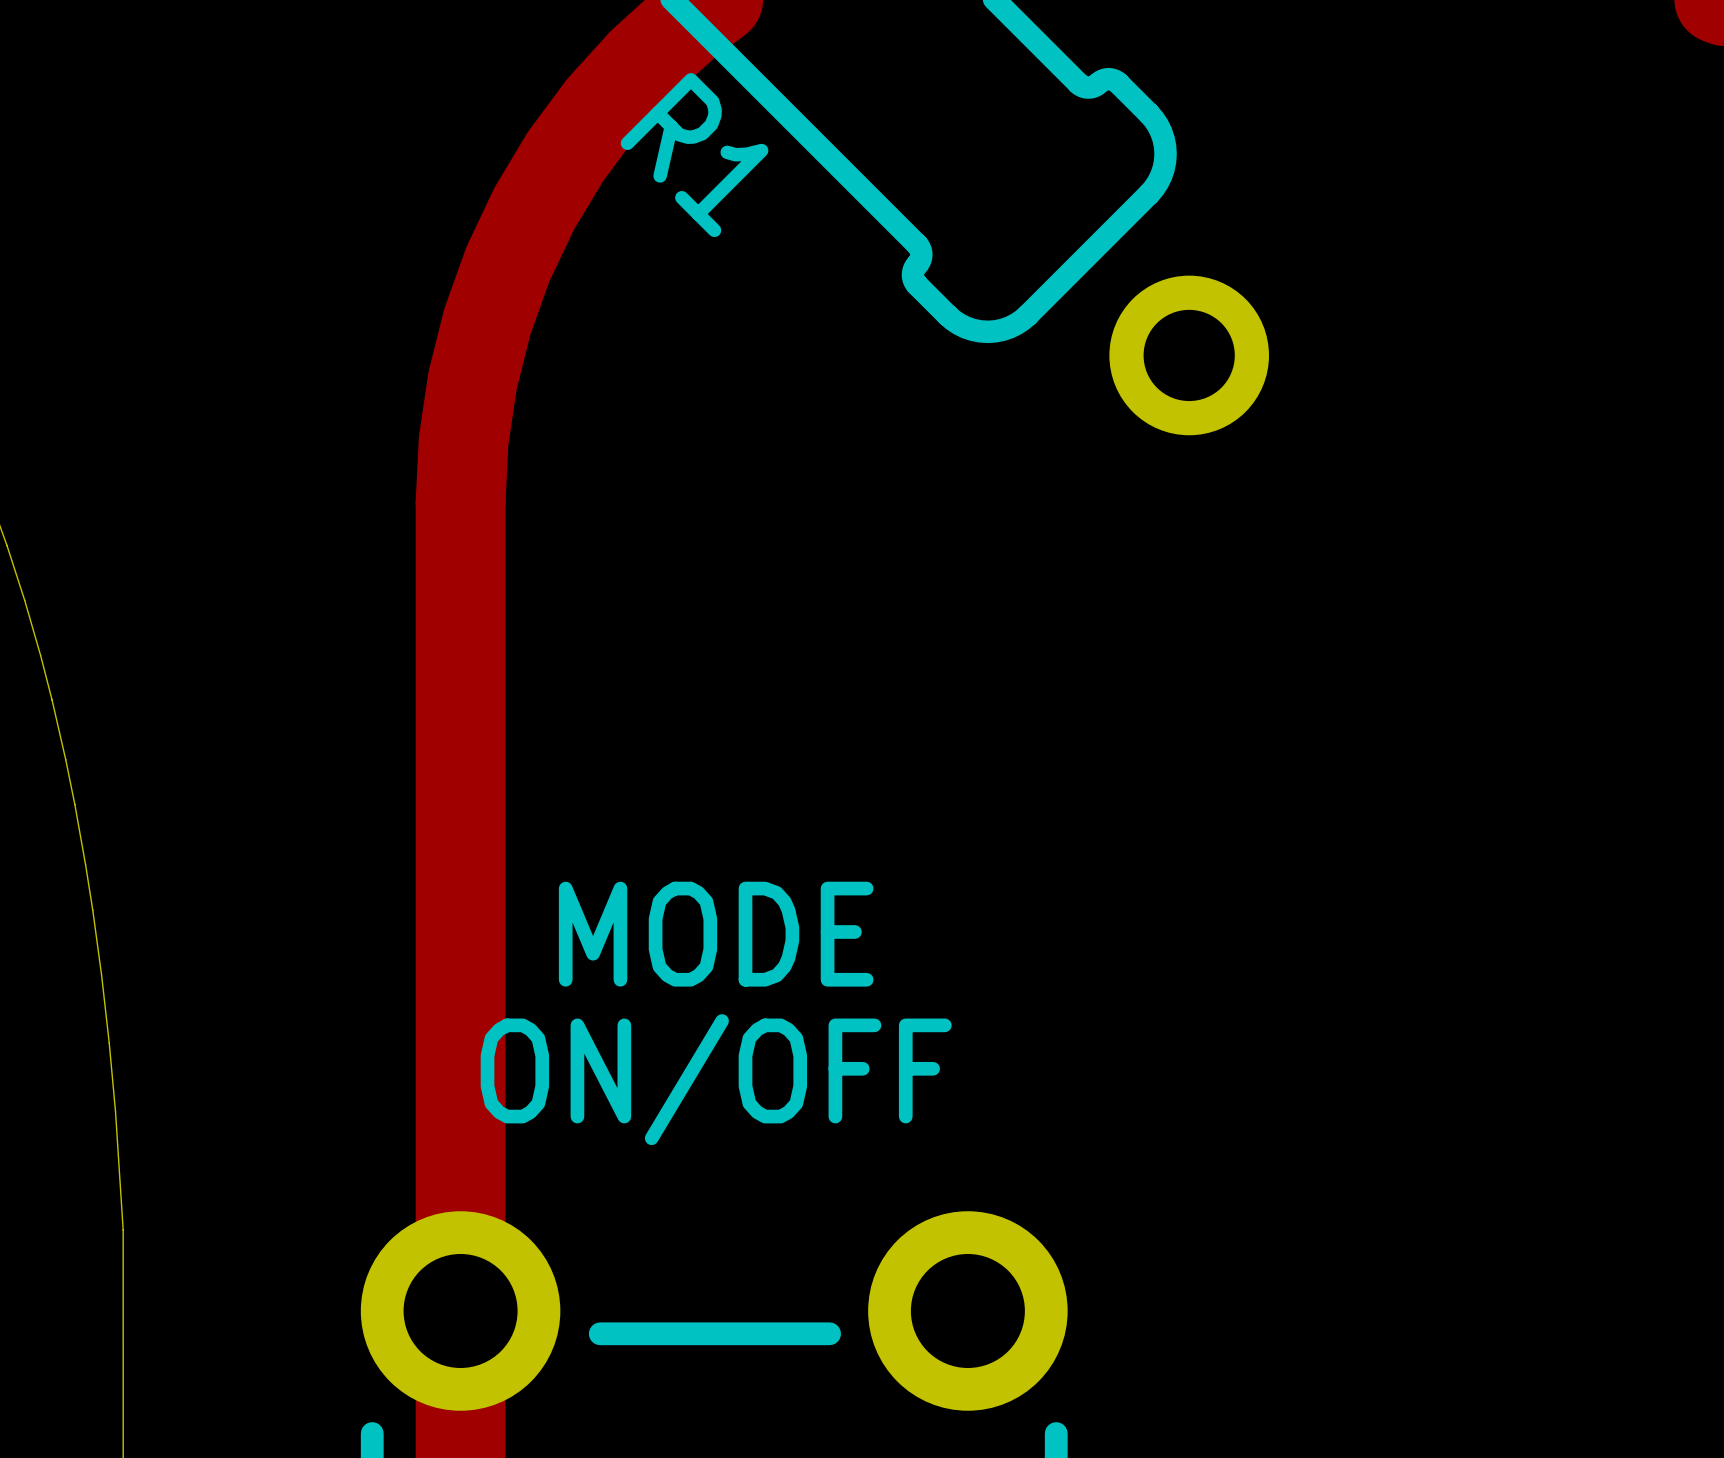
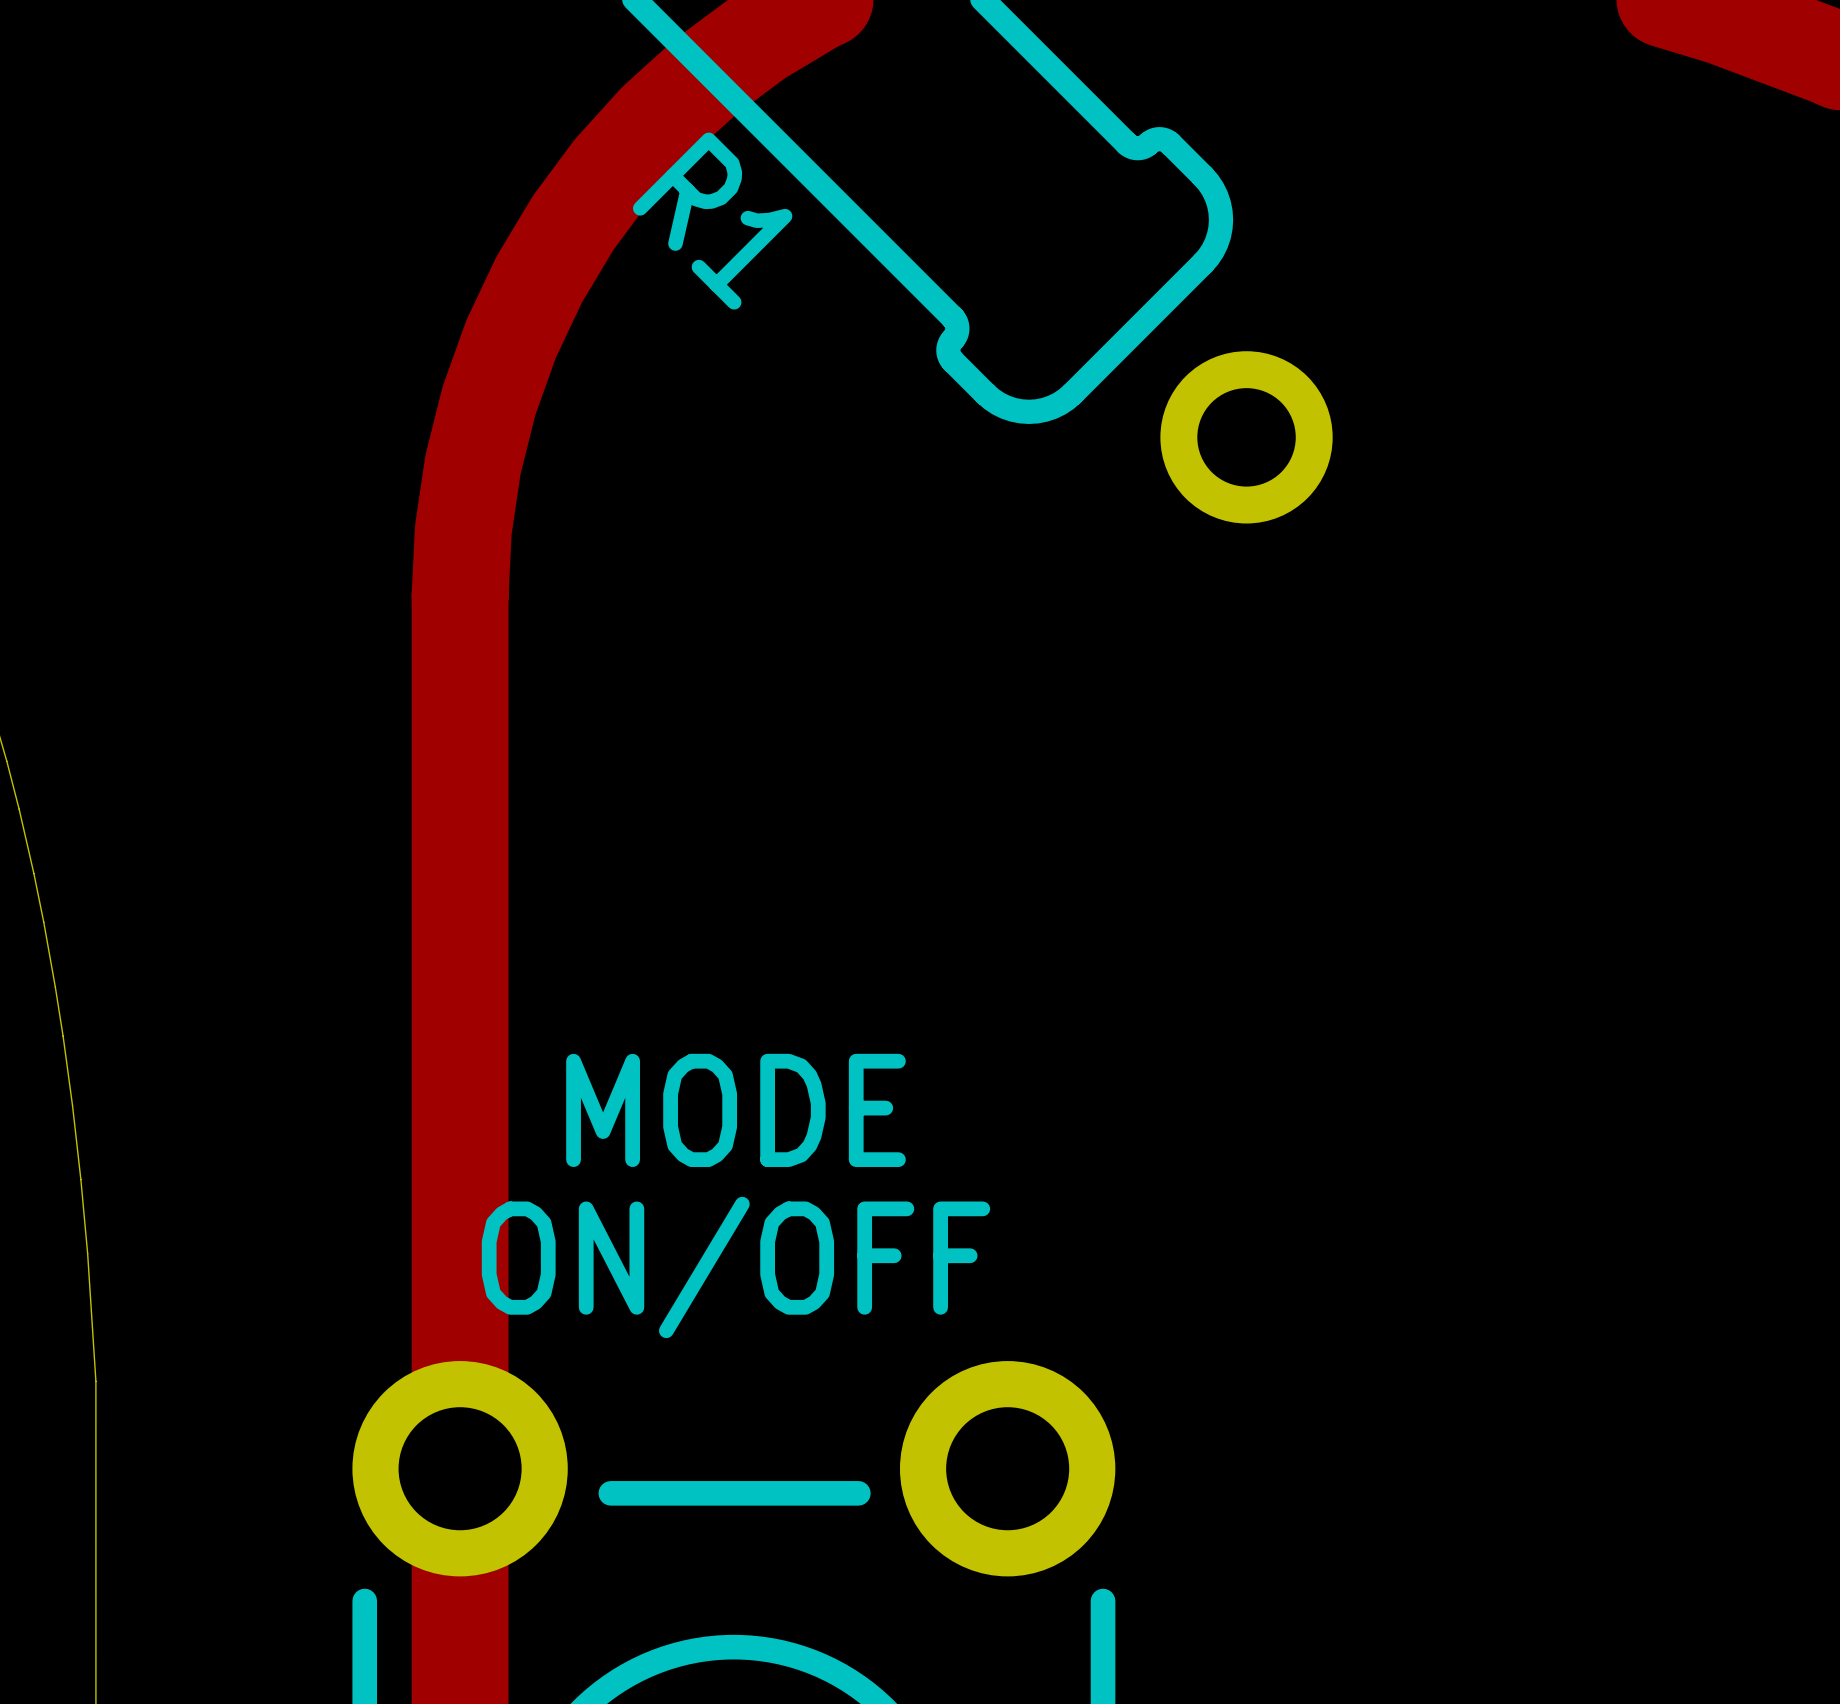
text position: MODE (716, 934) -> MODE (735, 1110)
text position: ON/OFF (716, 1079) -> ON/OFF (735, 1267)

